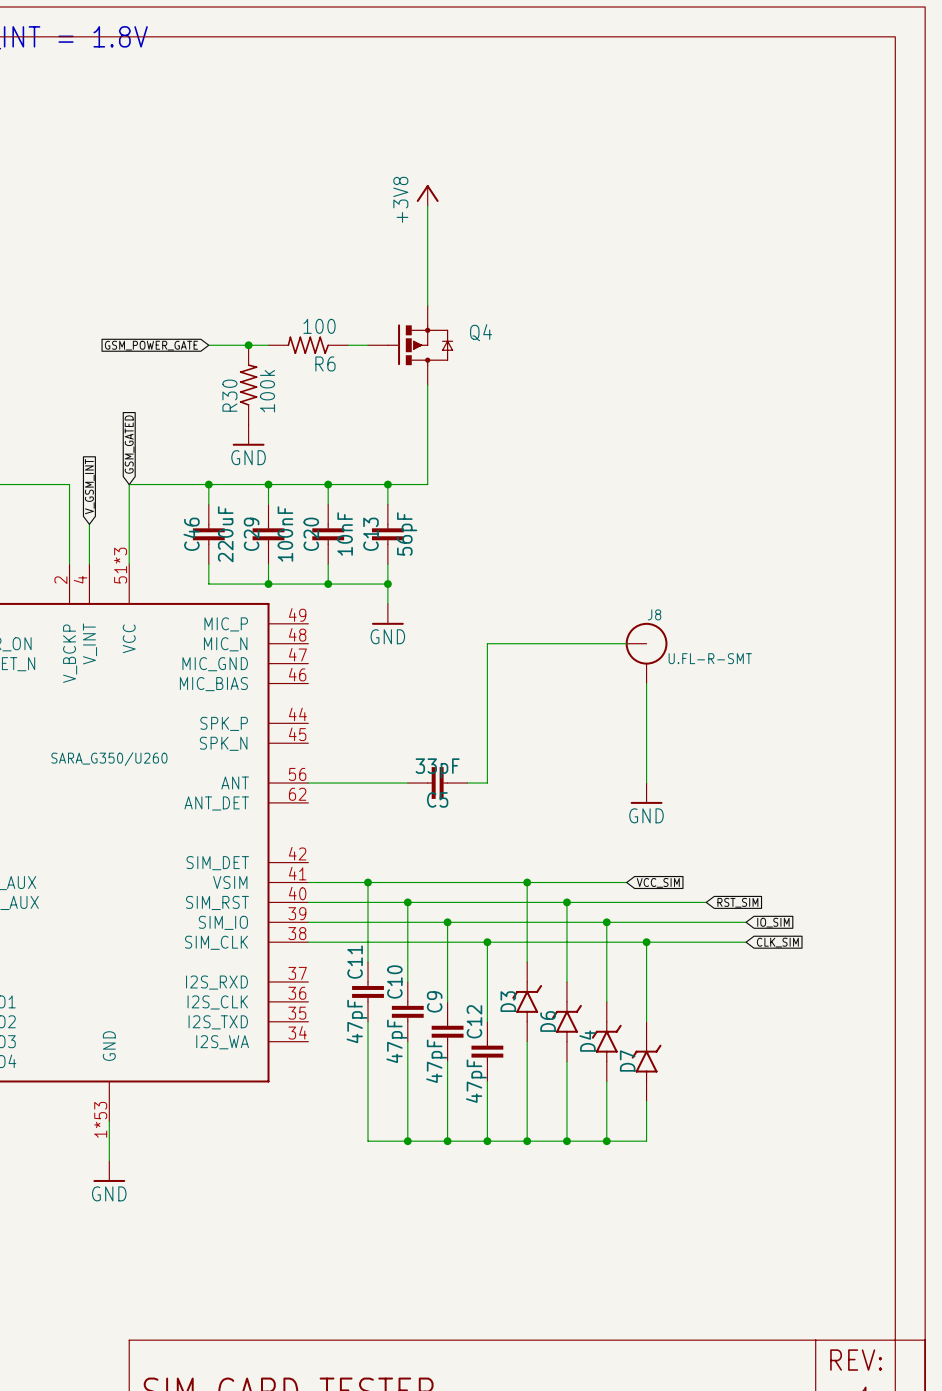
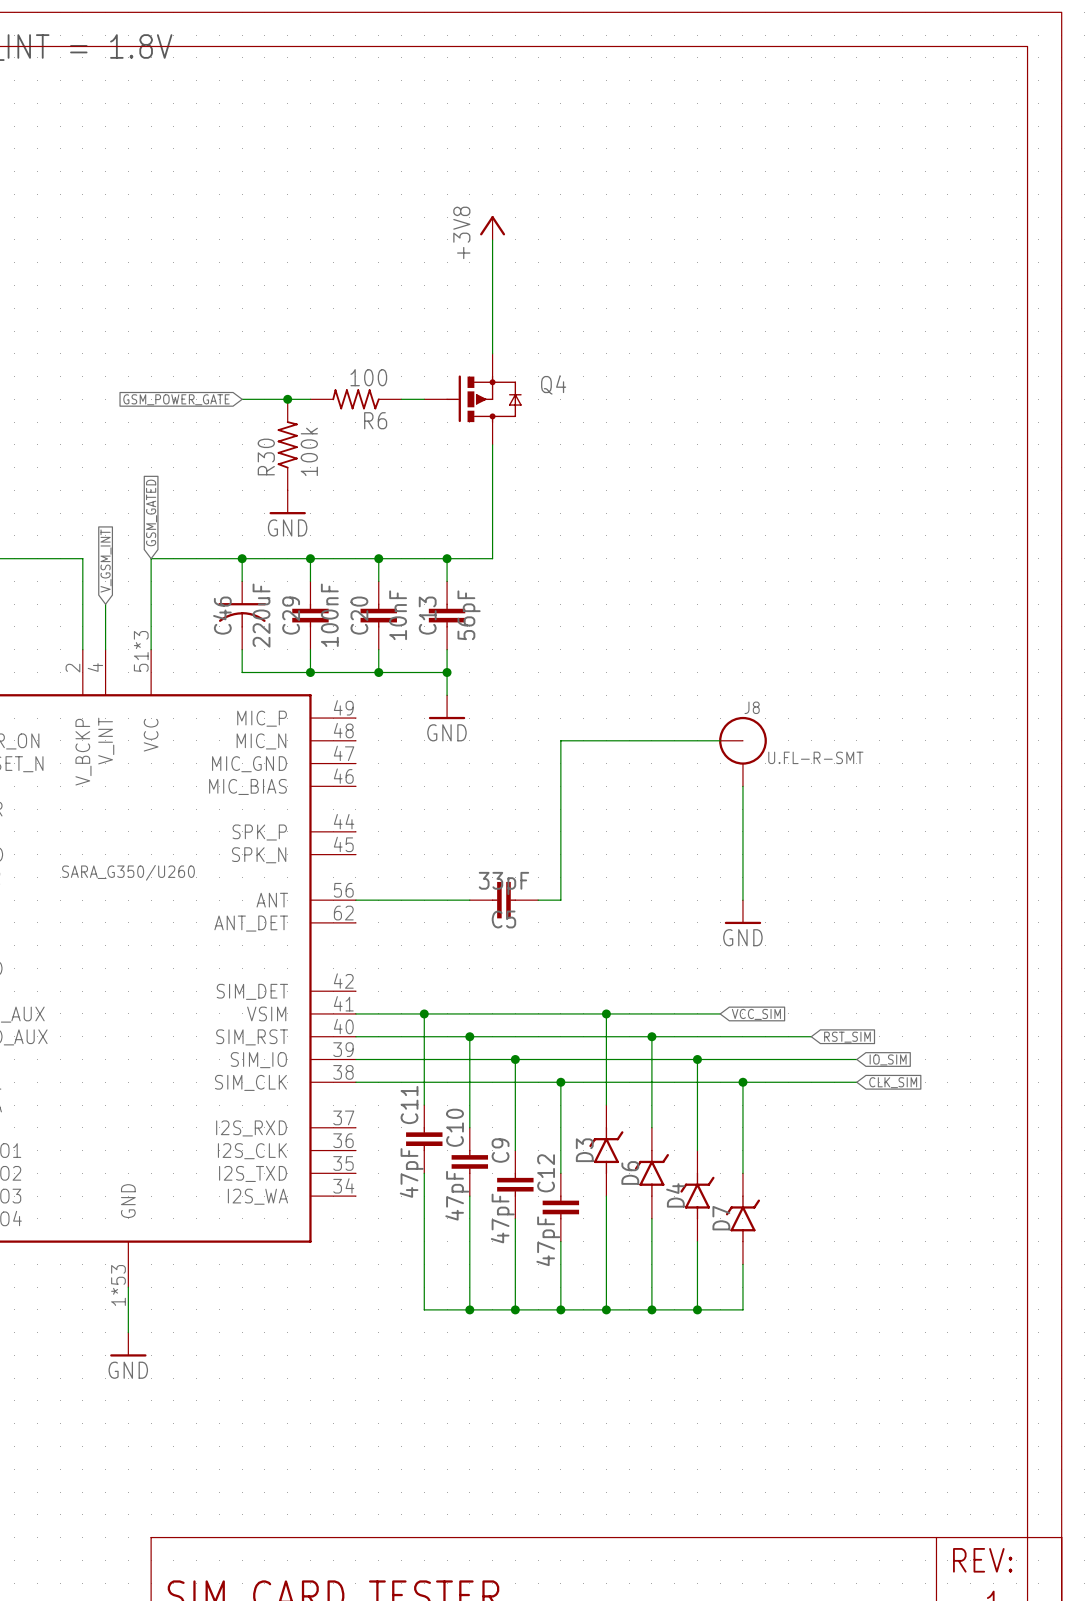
C46 symbol: [192, 504, 225, 565] -> [218, 581, 267, 650]

